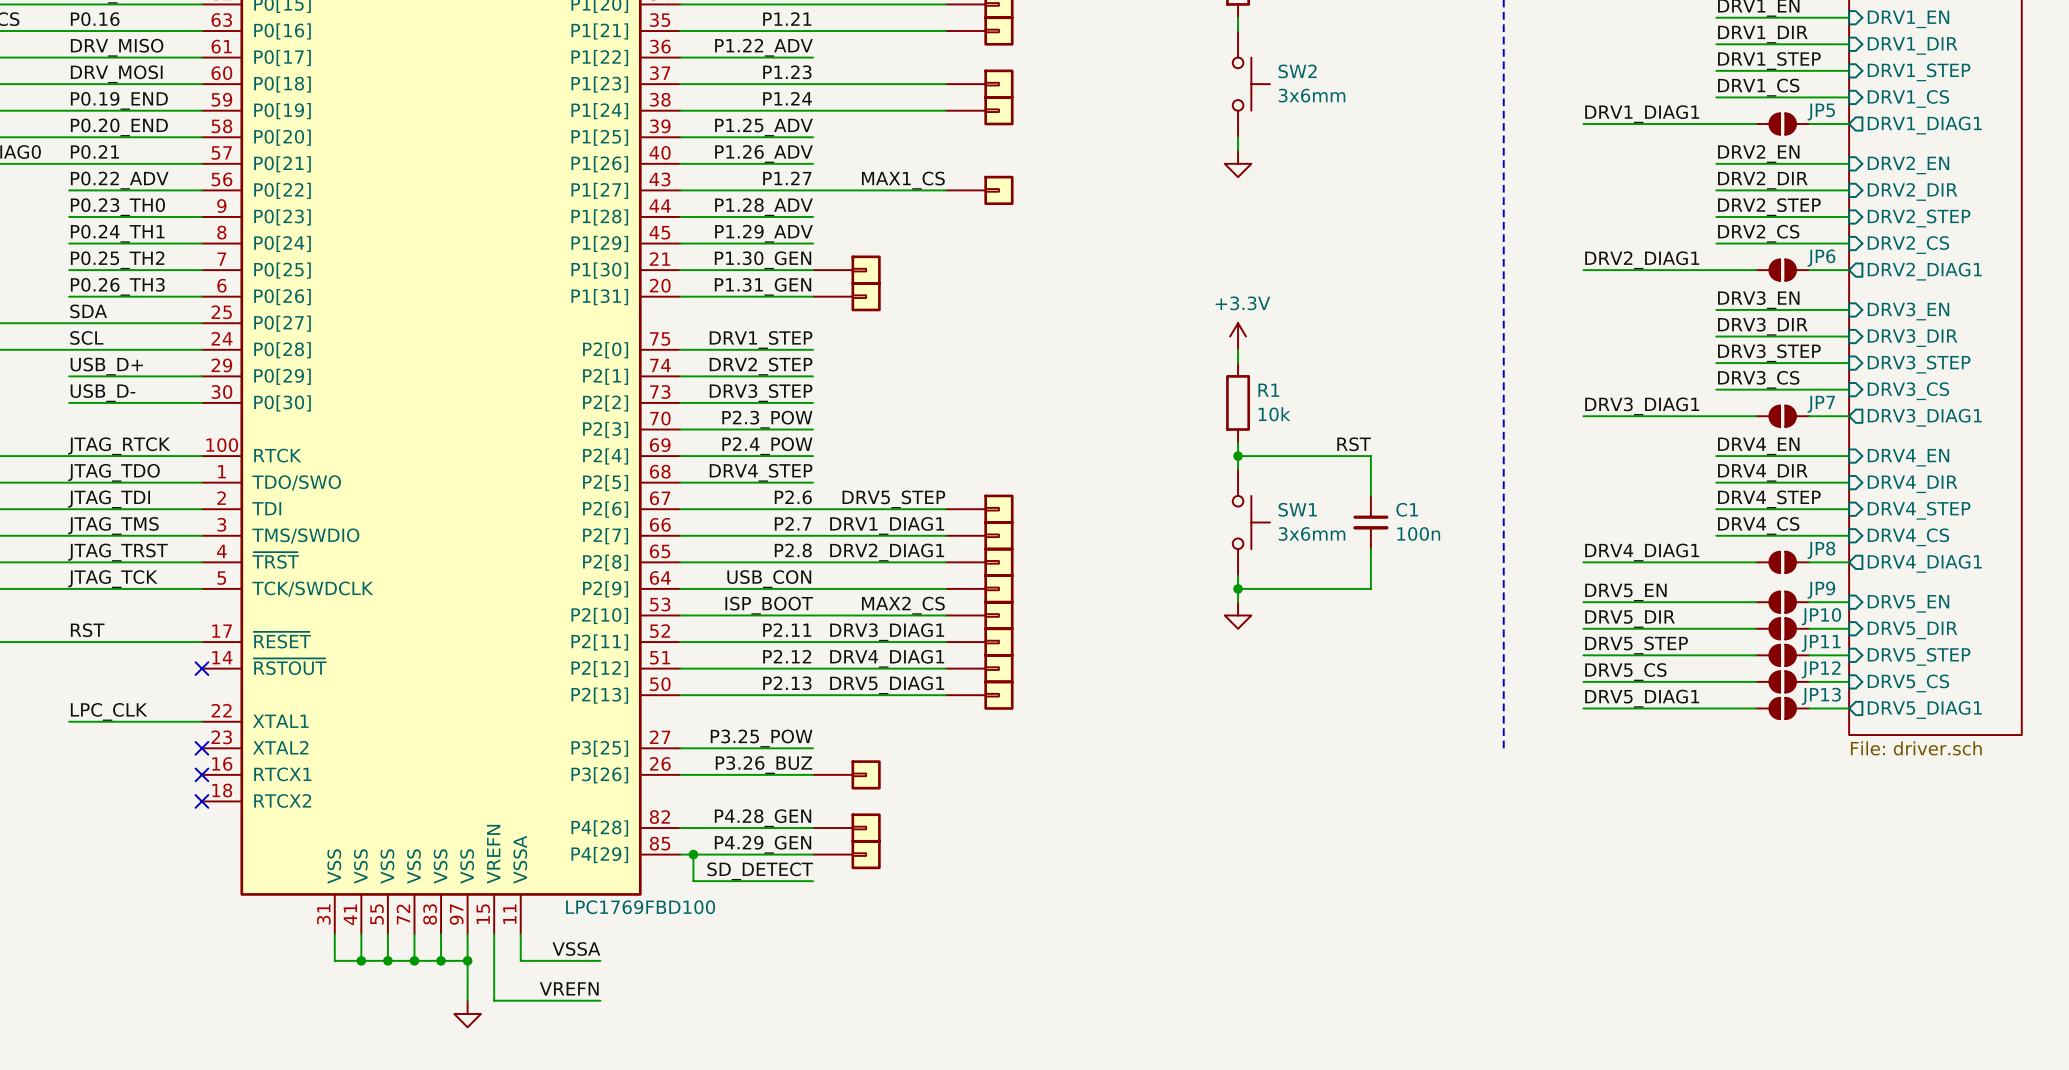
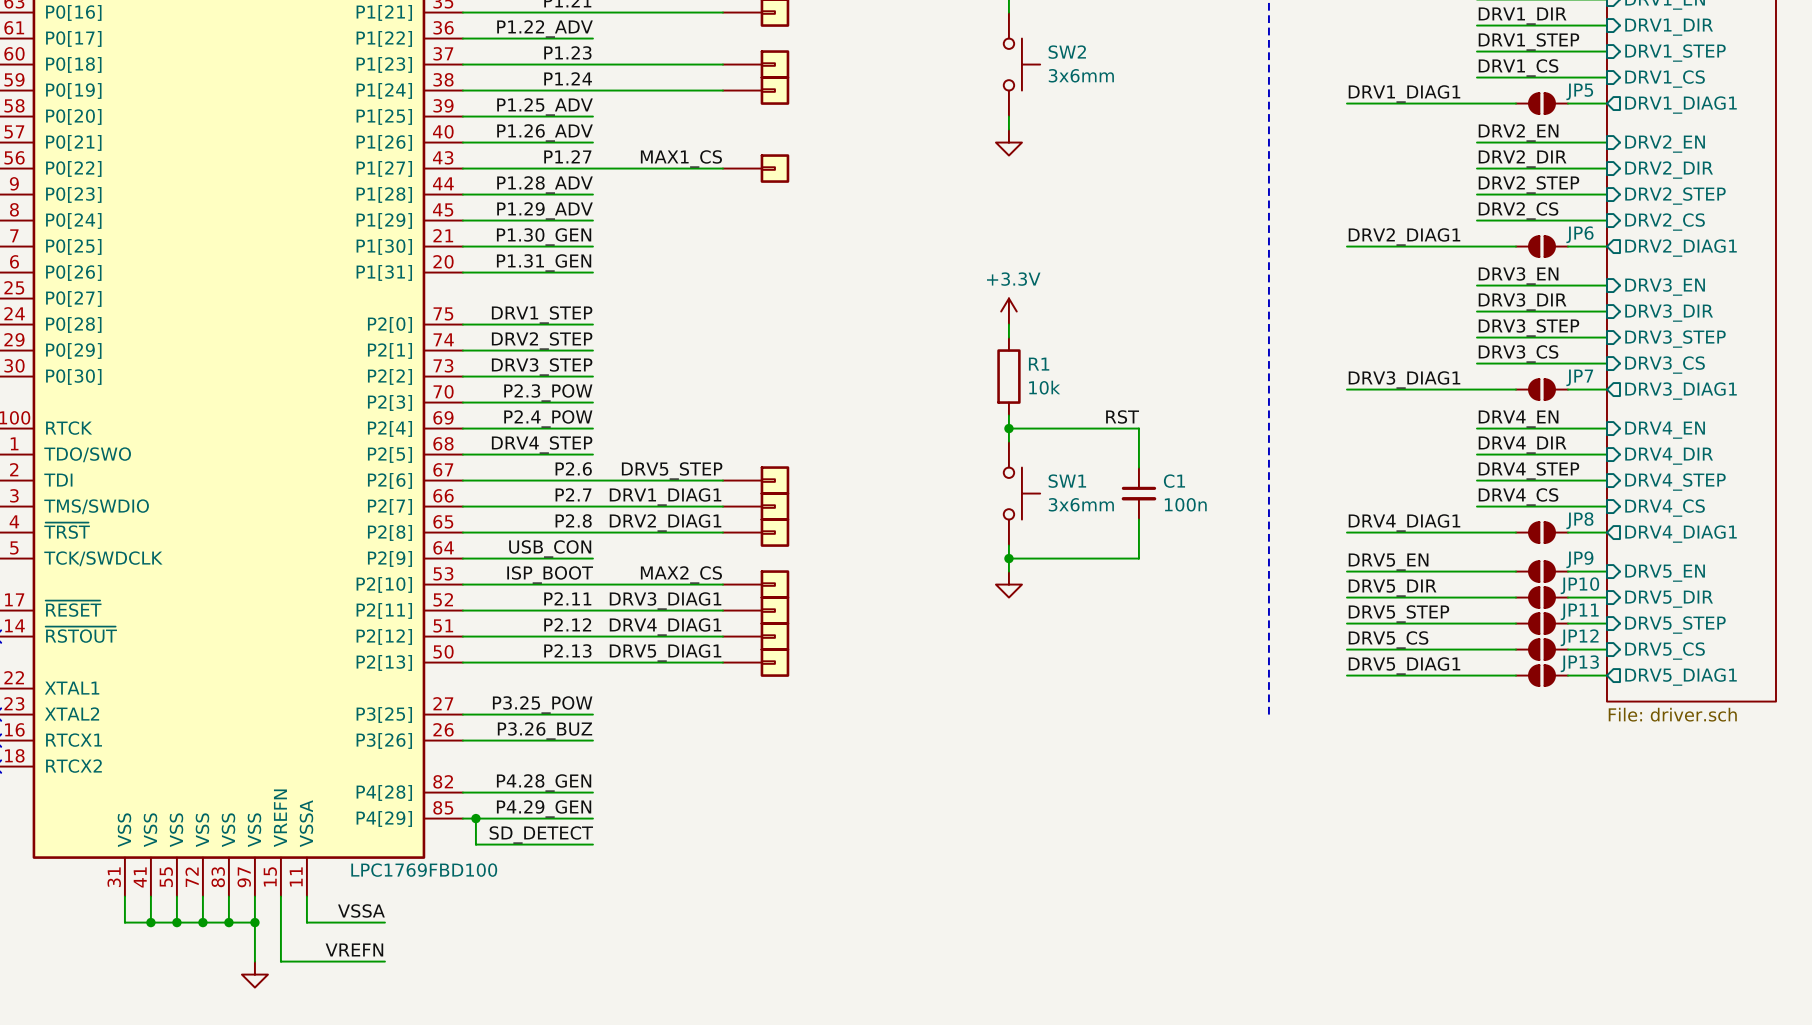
part: (846, 270) -> none
part: (846, 296) -> none
wire: (812, 588) (945, 588) -> none
part: (979, 588) -> none
part: (846, 774) -> none
part: (846, 828) -> none
part: (846, 854) -> none

